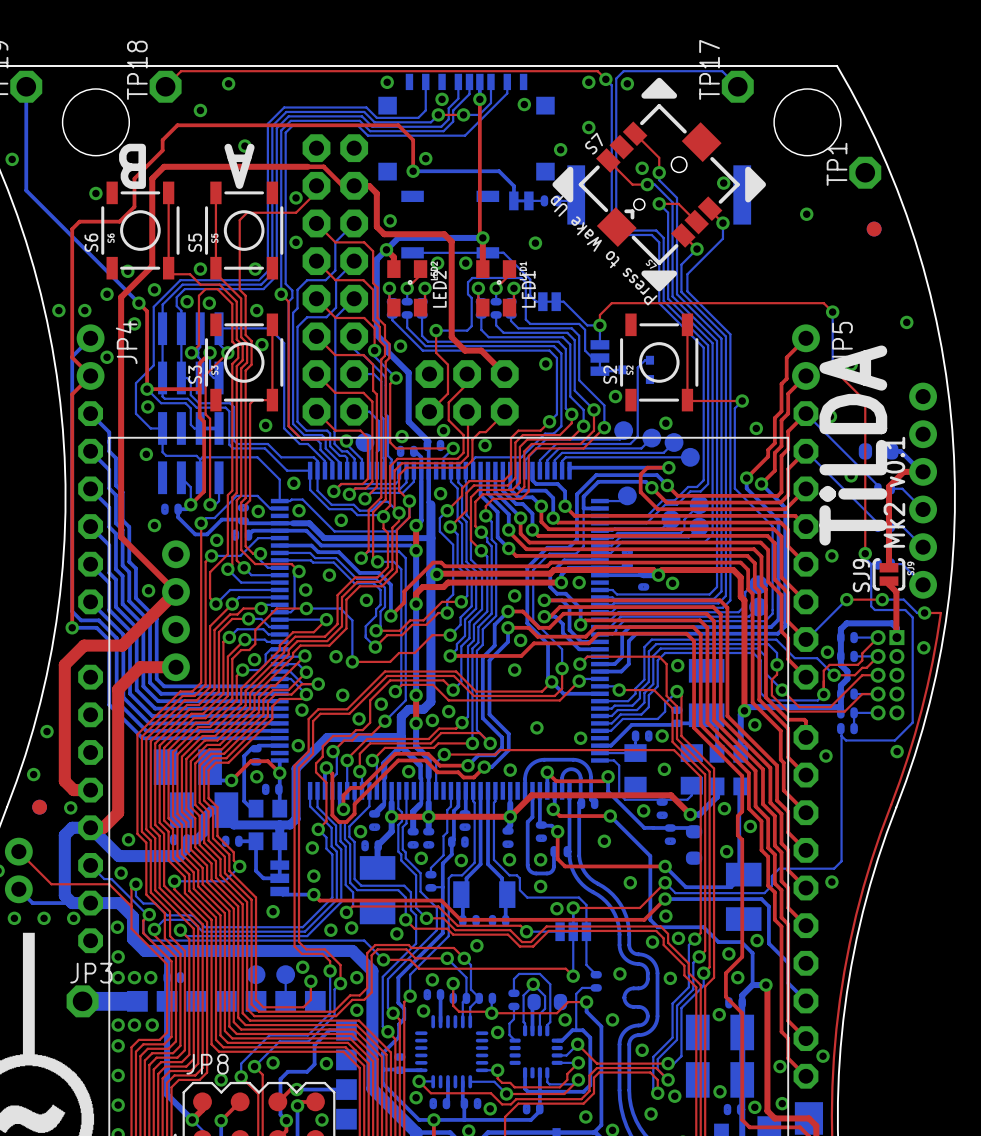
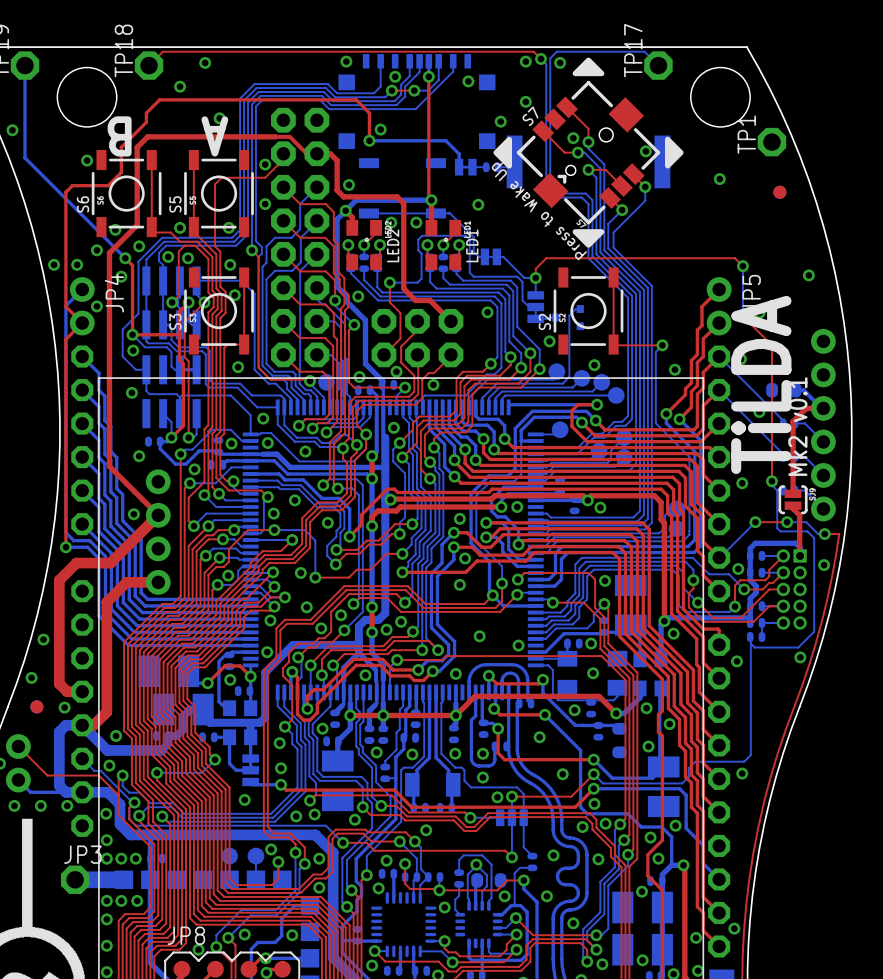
text: SJ9 (861, 575) -> none

